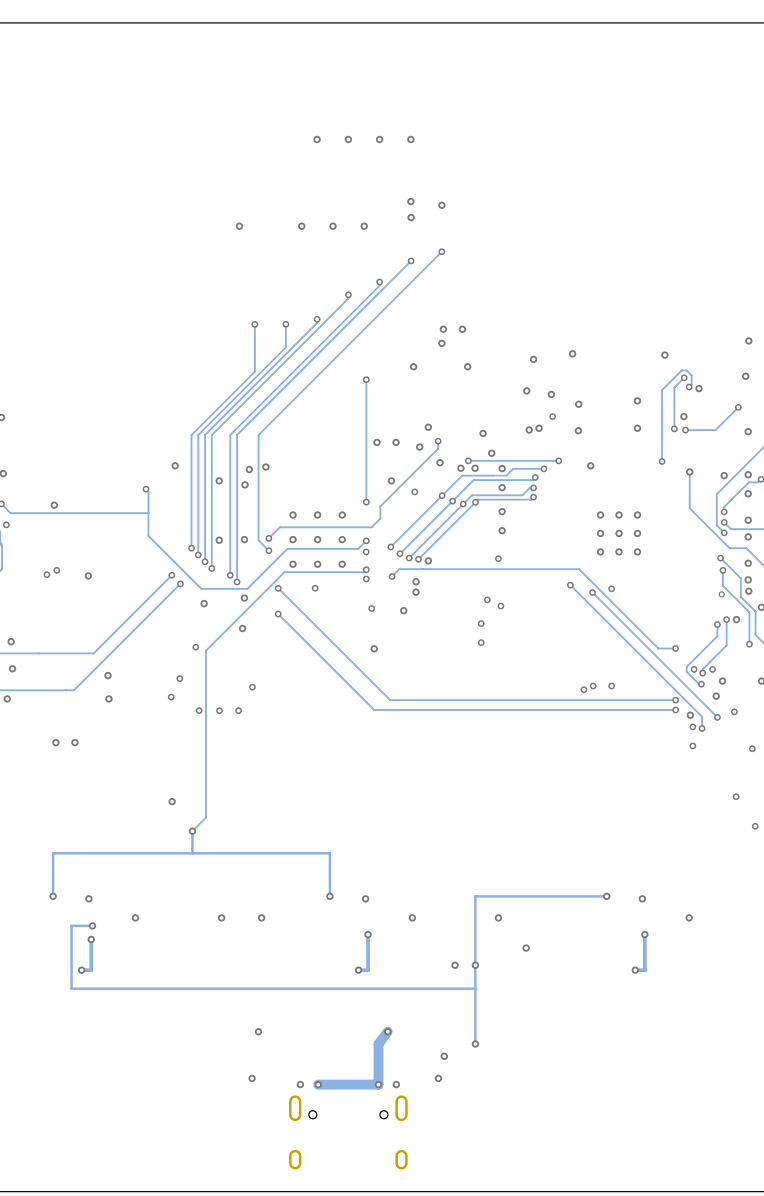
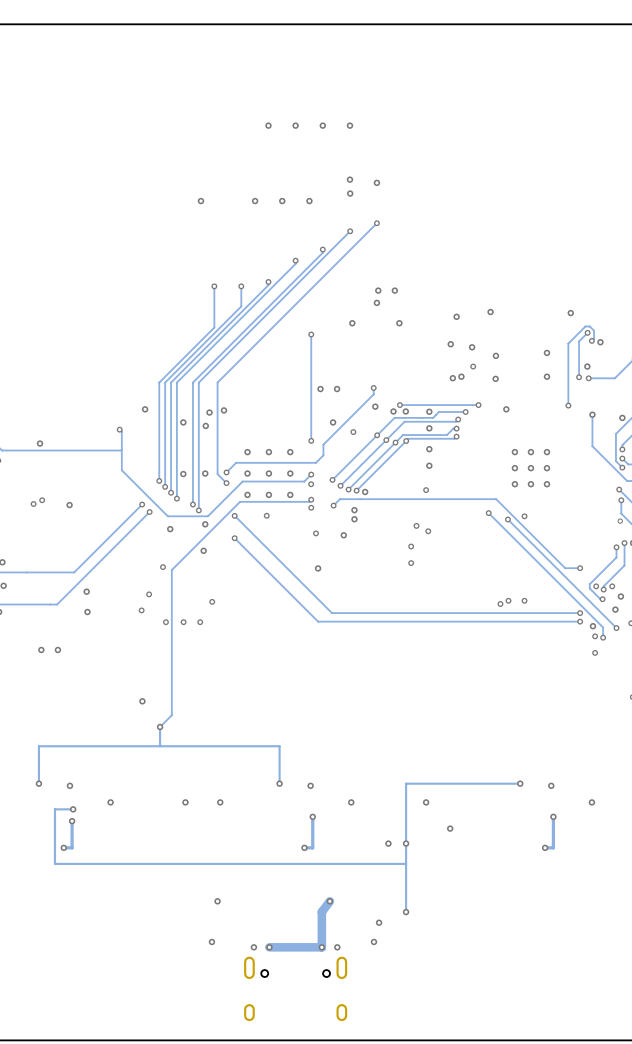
via: (428, 427) -> none
via: (483, 433) -> none
via: (419, 447) -> none
via: (491, 453) -> none

